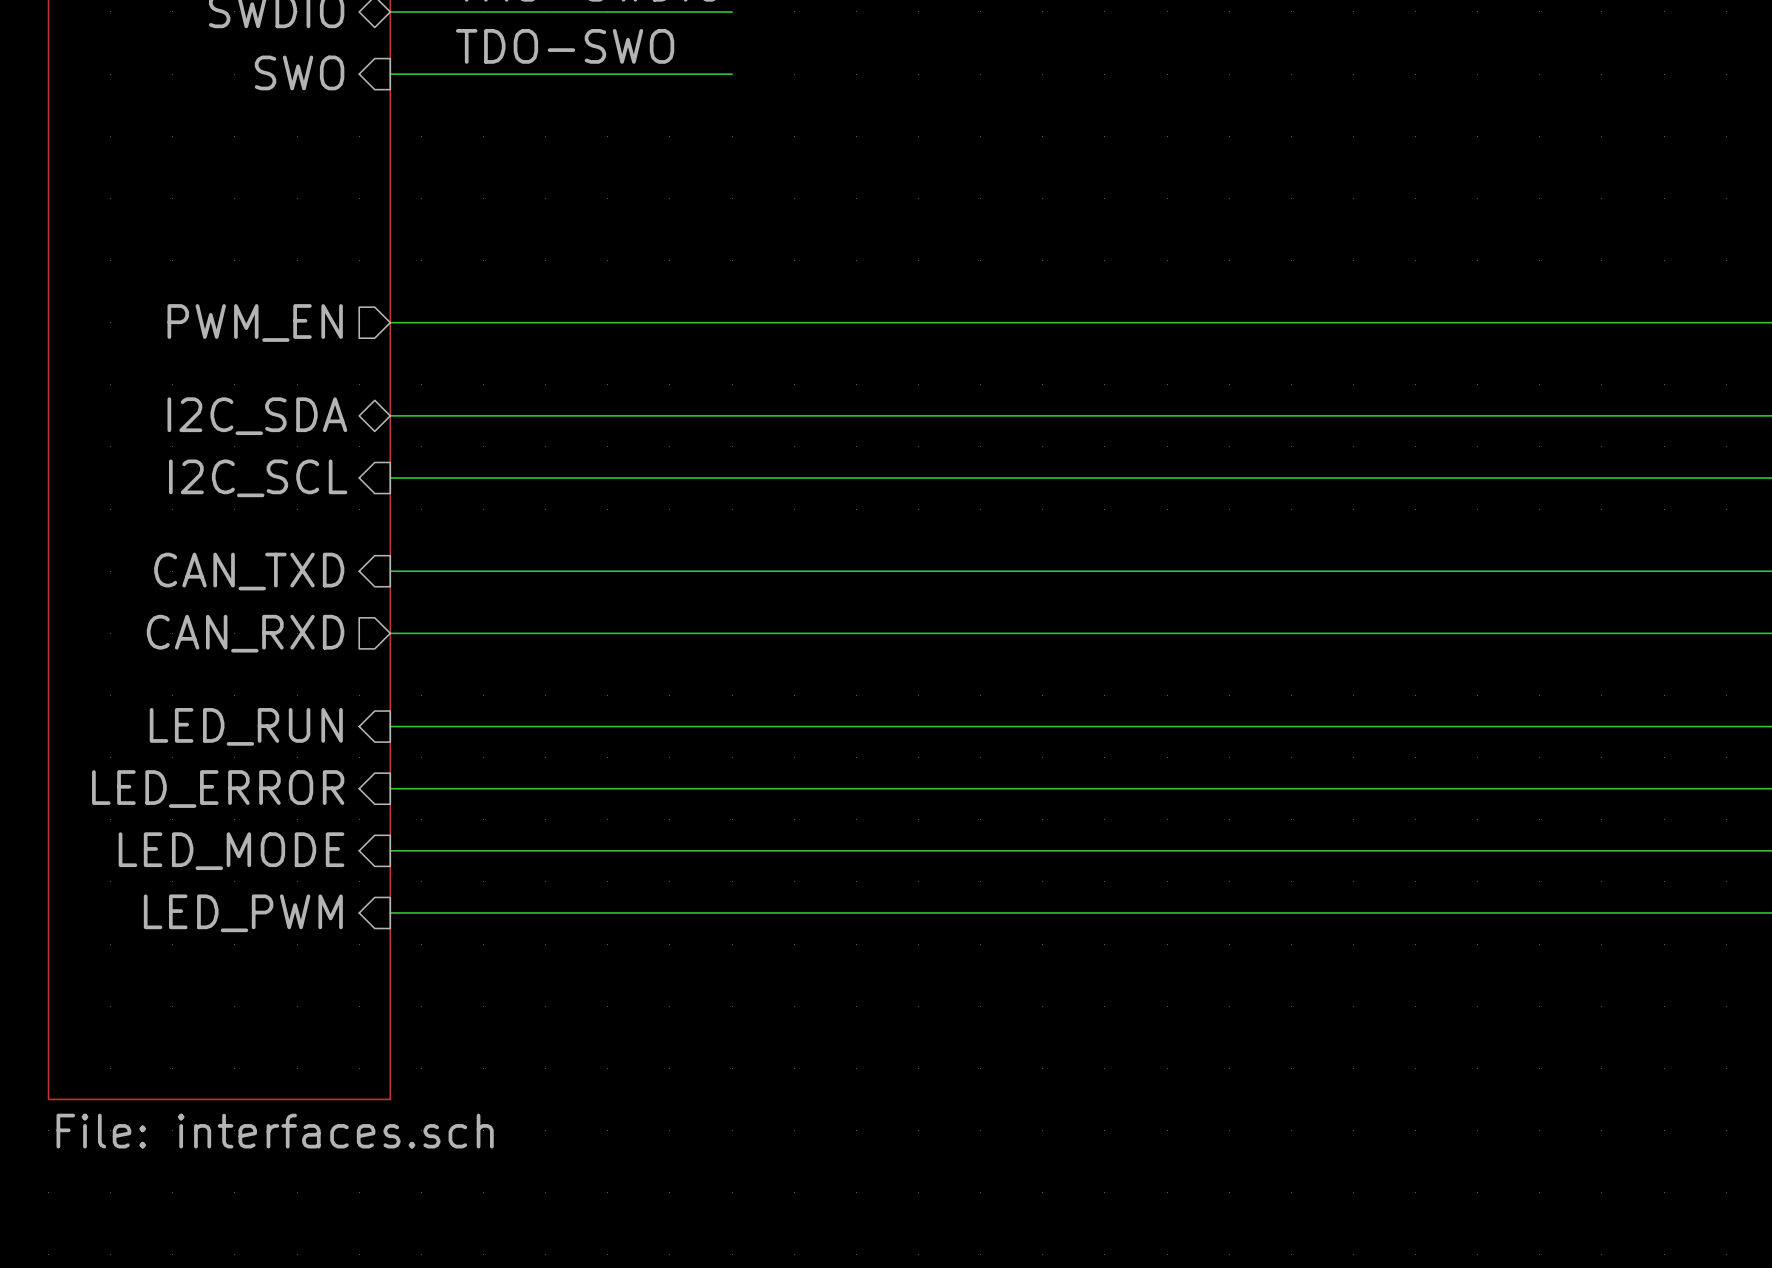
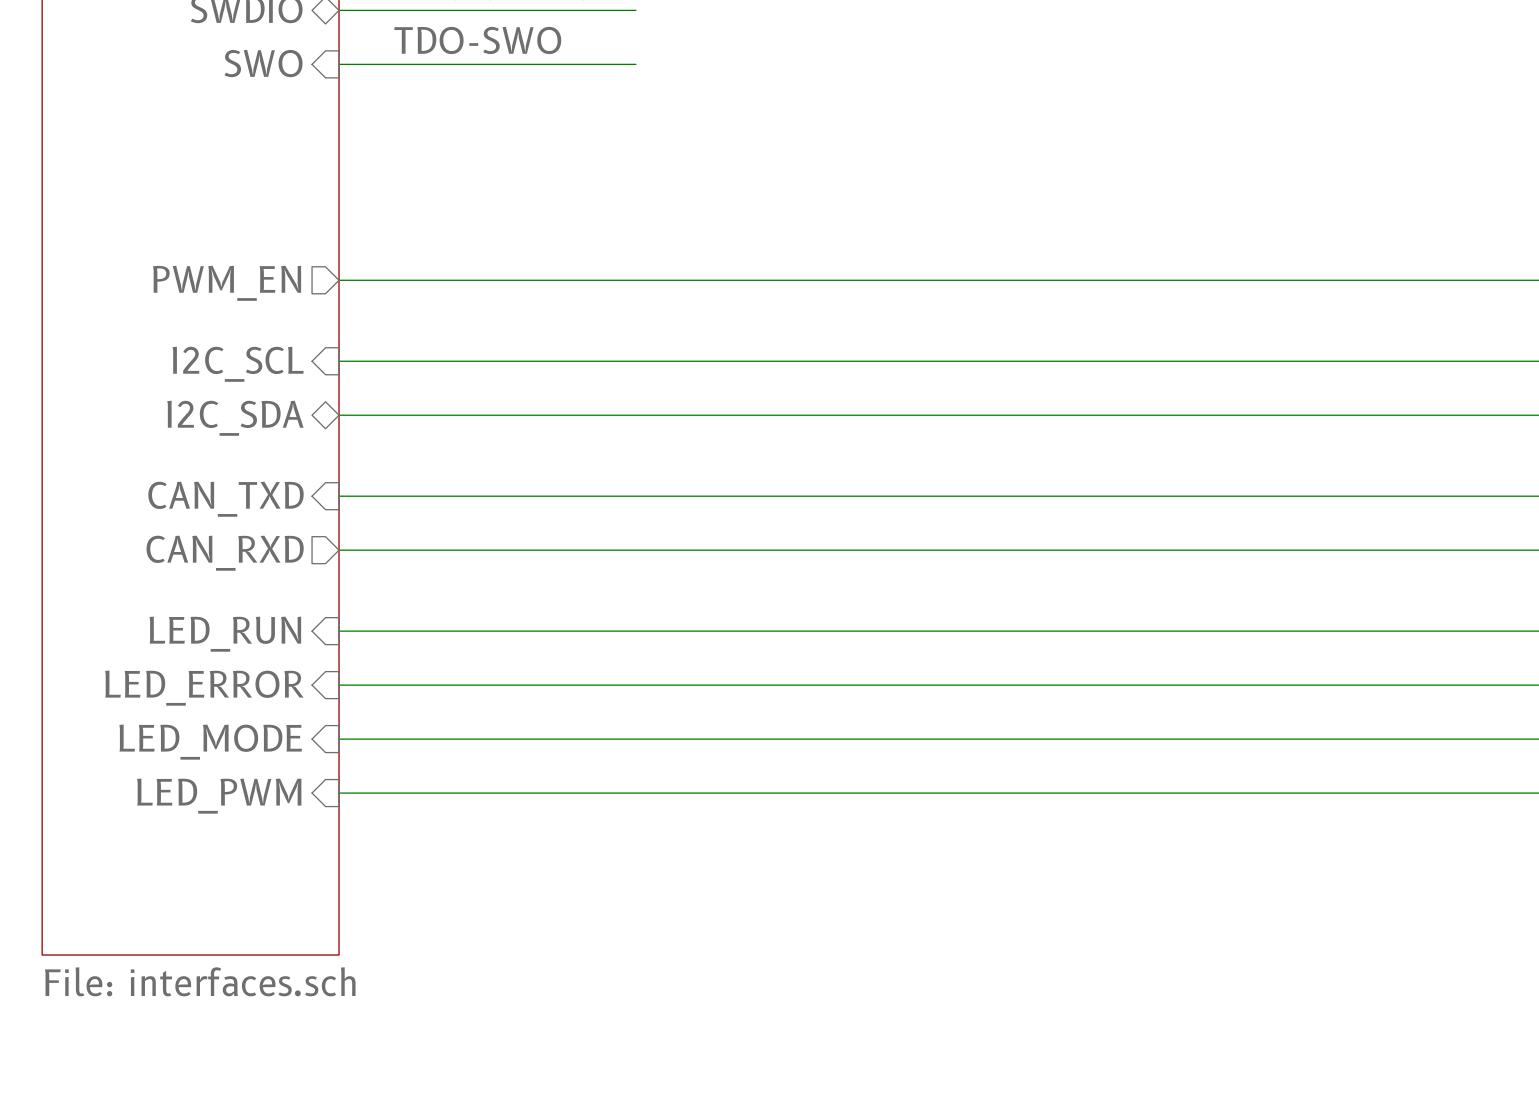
sheet pin shape: bidirectional (257, 416) -> input (238, 364)
sheet pin: I2C_SDA (257, 416) -> I2C_SCL (238, 364)
sheet pin shape: input (258, 478) -> bidirectional (235, 418)
sheet pin: I2C_SCL (258, 478) -> I2C_SDA (235, 418)

